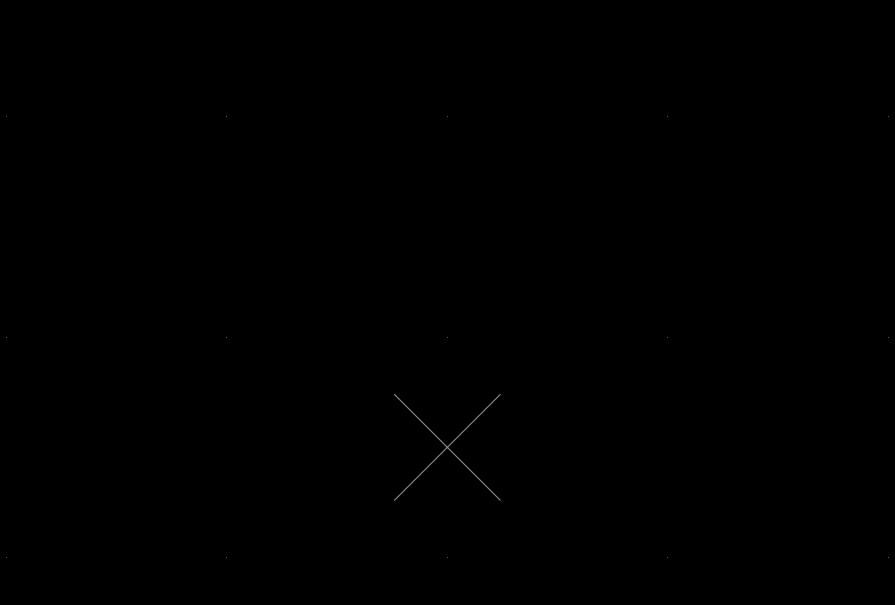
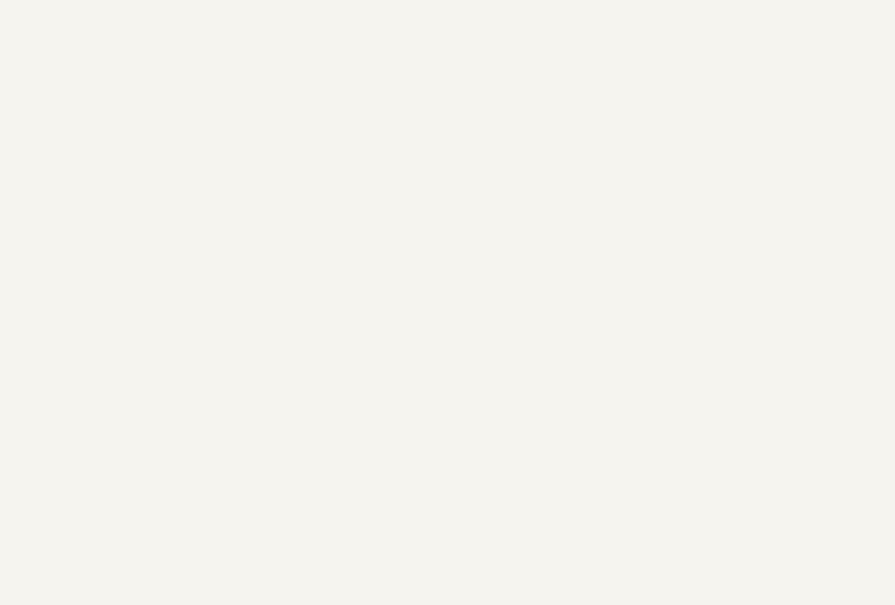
no-connect mark: (447, 447) -> none

